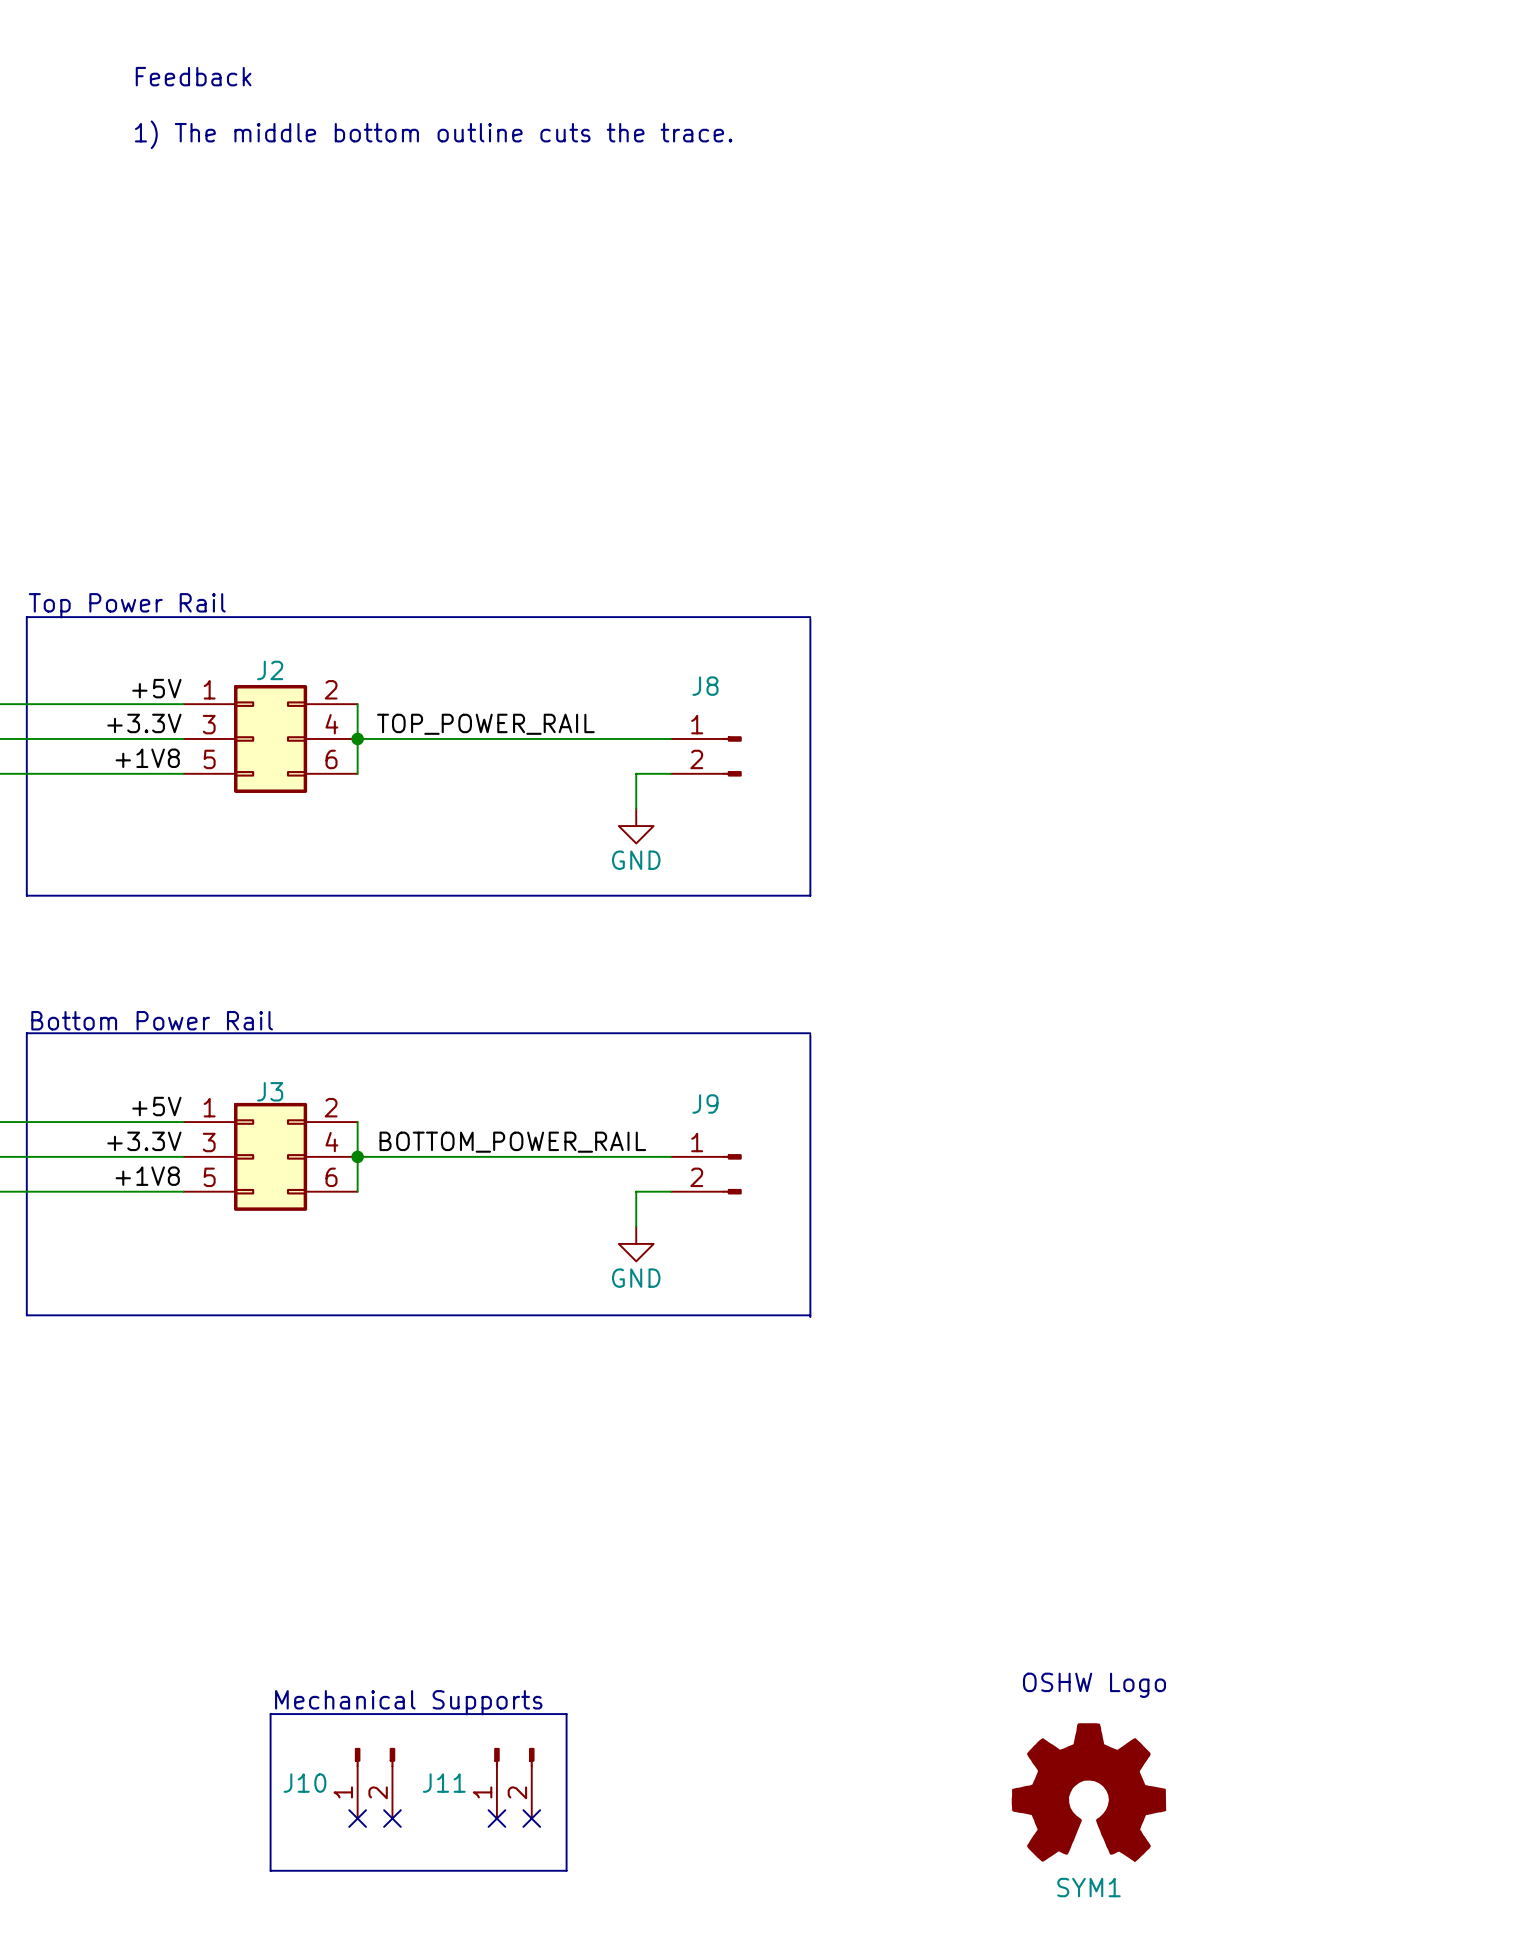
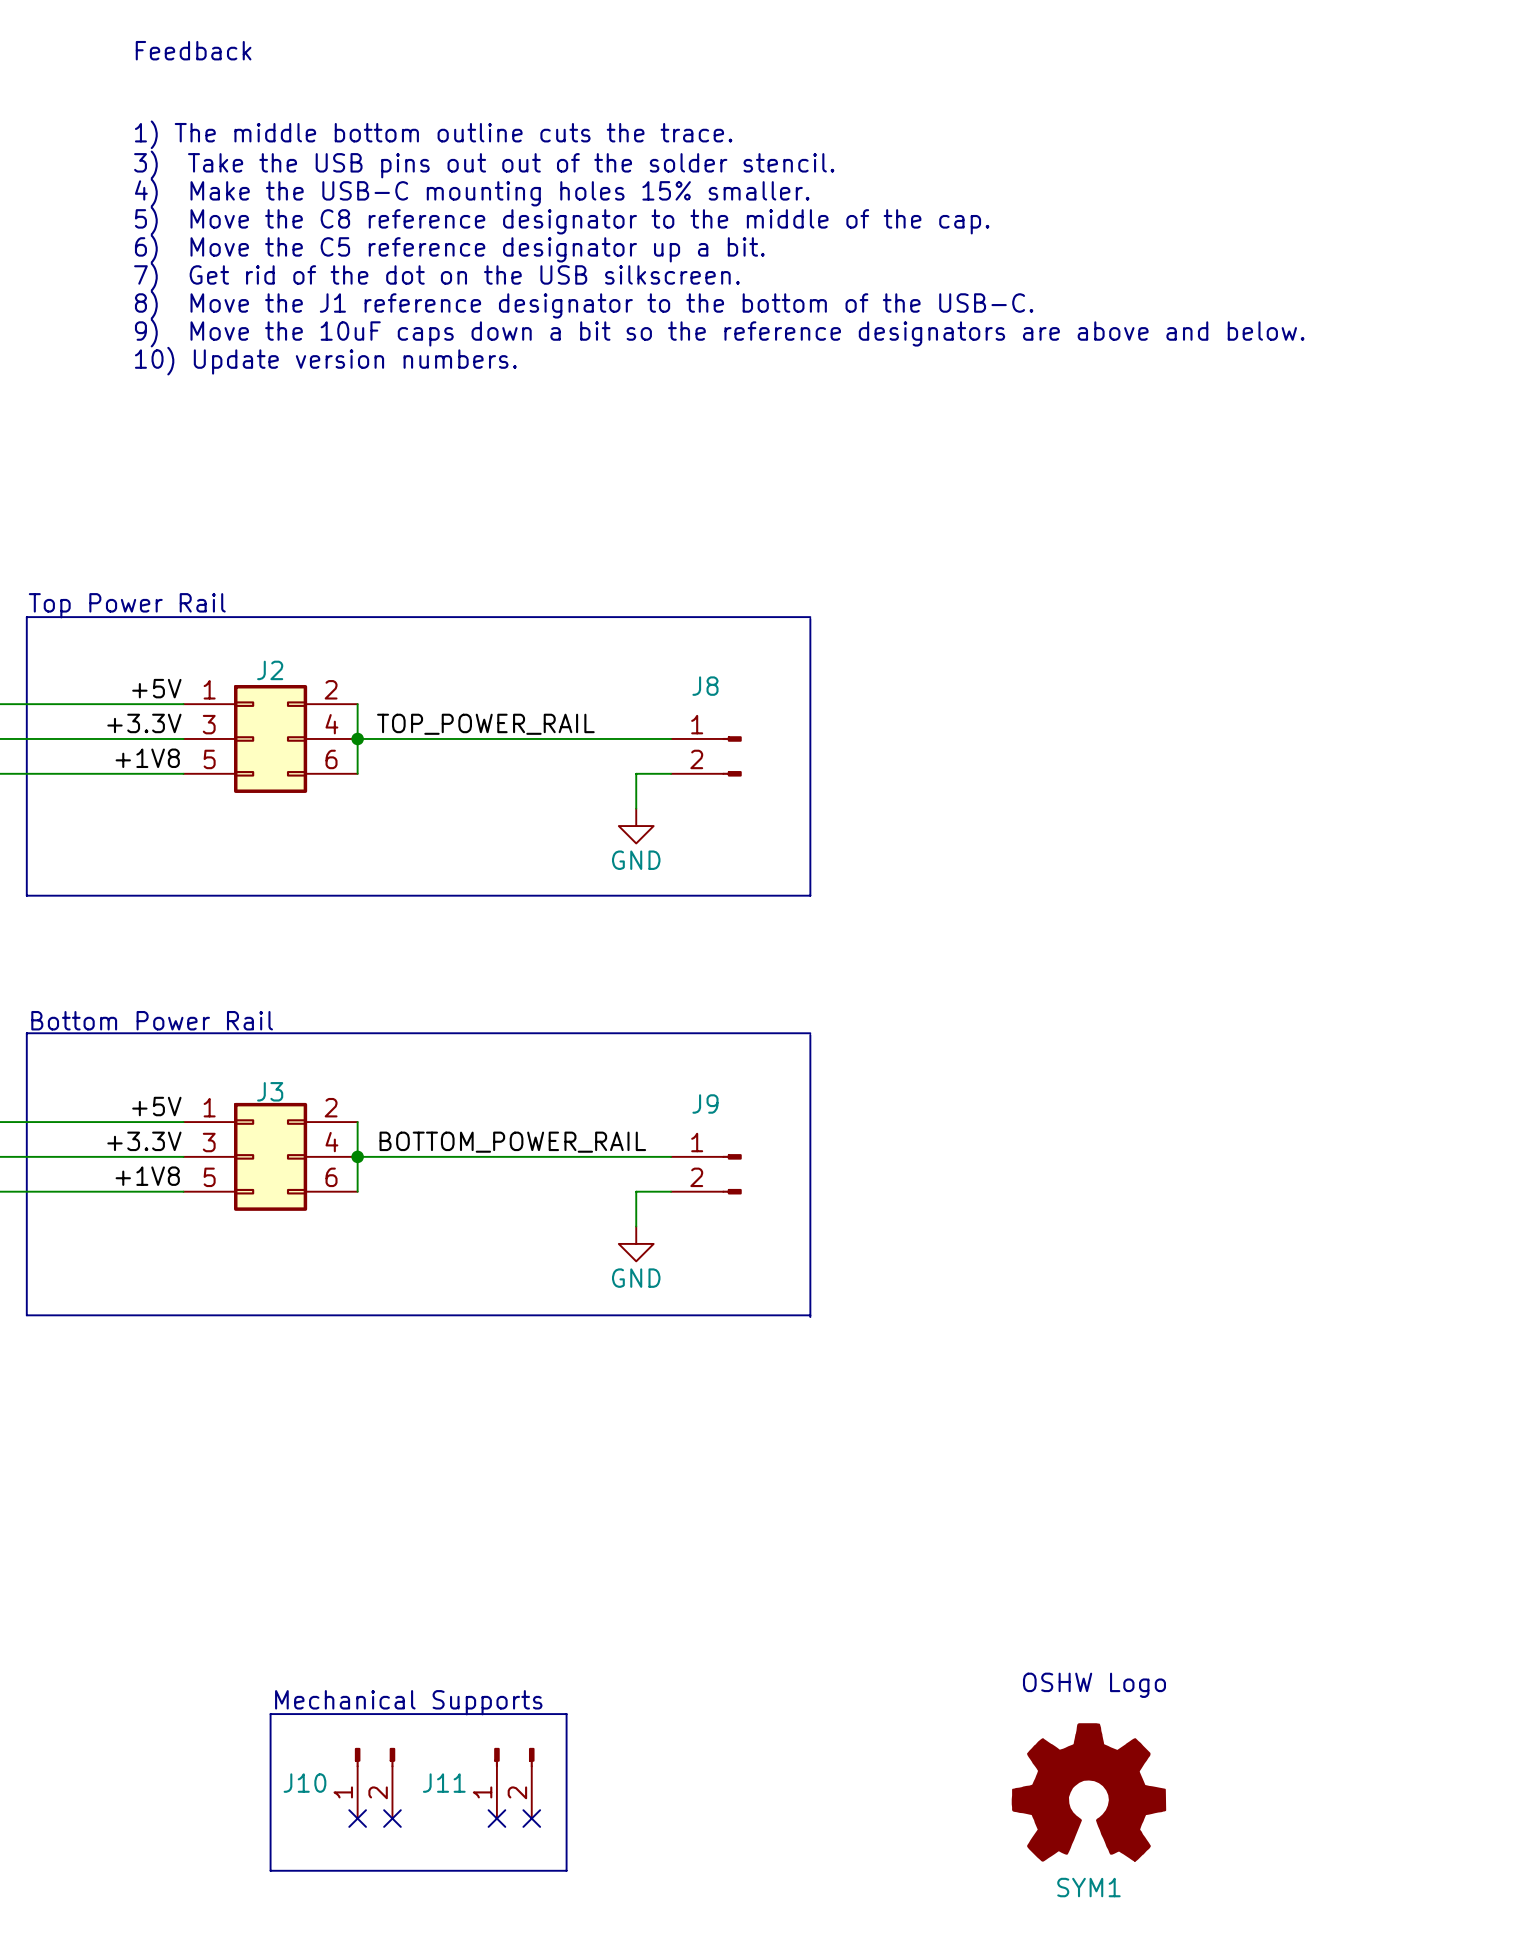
text position: Feedback (193, 76) -> Feedback (193, 50)
text: none -> 3) Take the USB pins out out of the solder stencil. (484, 164)
text: none -> 4) Make the USB-C mounting holes 15% smaller. (472, 192)
text: none -> 5) Move the C8 reference designator to the middle of the cap. (562, 220)
text: none -> 6) Move the C5 reference designator up a bit. (449, 249)
text: none -> 7) Get rid of the dot on the USB silkscreen. (436, 277)
text: none -> 8) Move the J1 reference designator to the bottom of the USB-C. (584, 305)
text: none -> 9) Move the 10uF caps down a bit so the reference designators are above and below. (719, 333)
text: none -> 10) Update version numbers. (325, 361)

